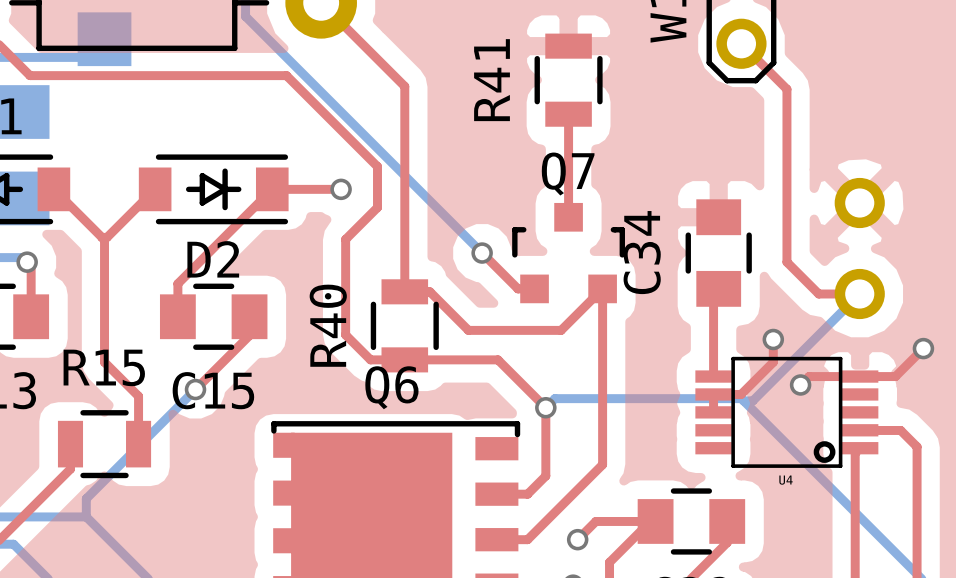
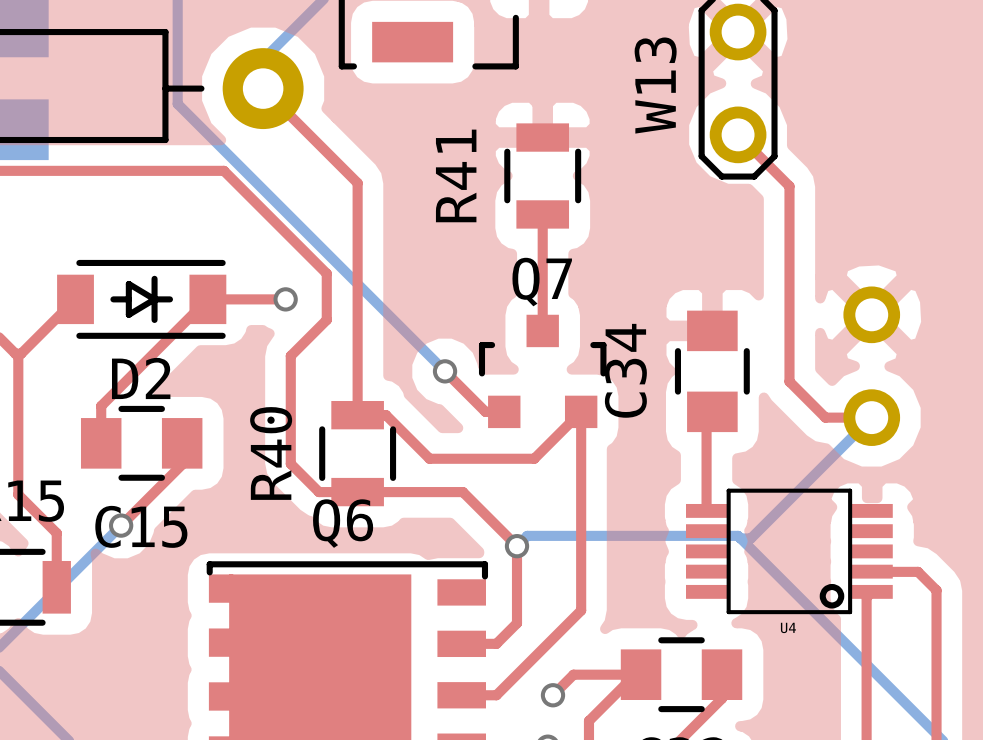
top track: (773, 339) (773, 362) (741, 394) (713, 394) (713, 412) -> none
via: (773, 339) -> none
top track: (923, 348) (895, 376) (809, 376) (800, 384) -> none
via: (923, 348) -> none
via: (800, 384) -> none

